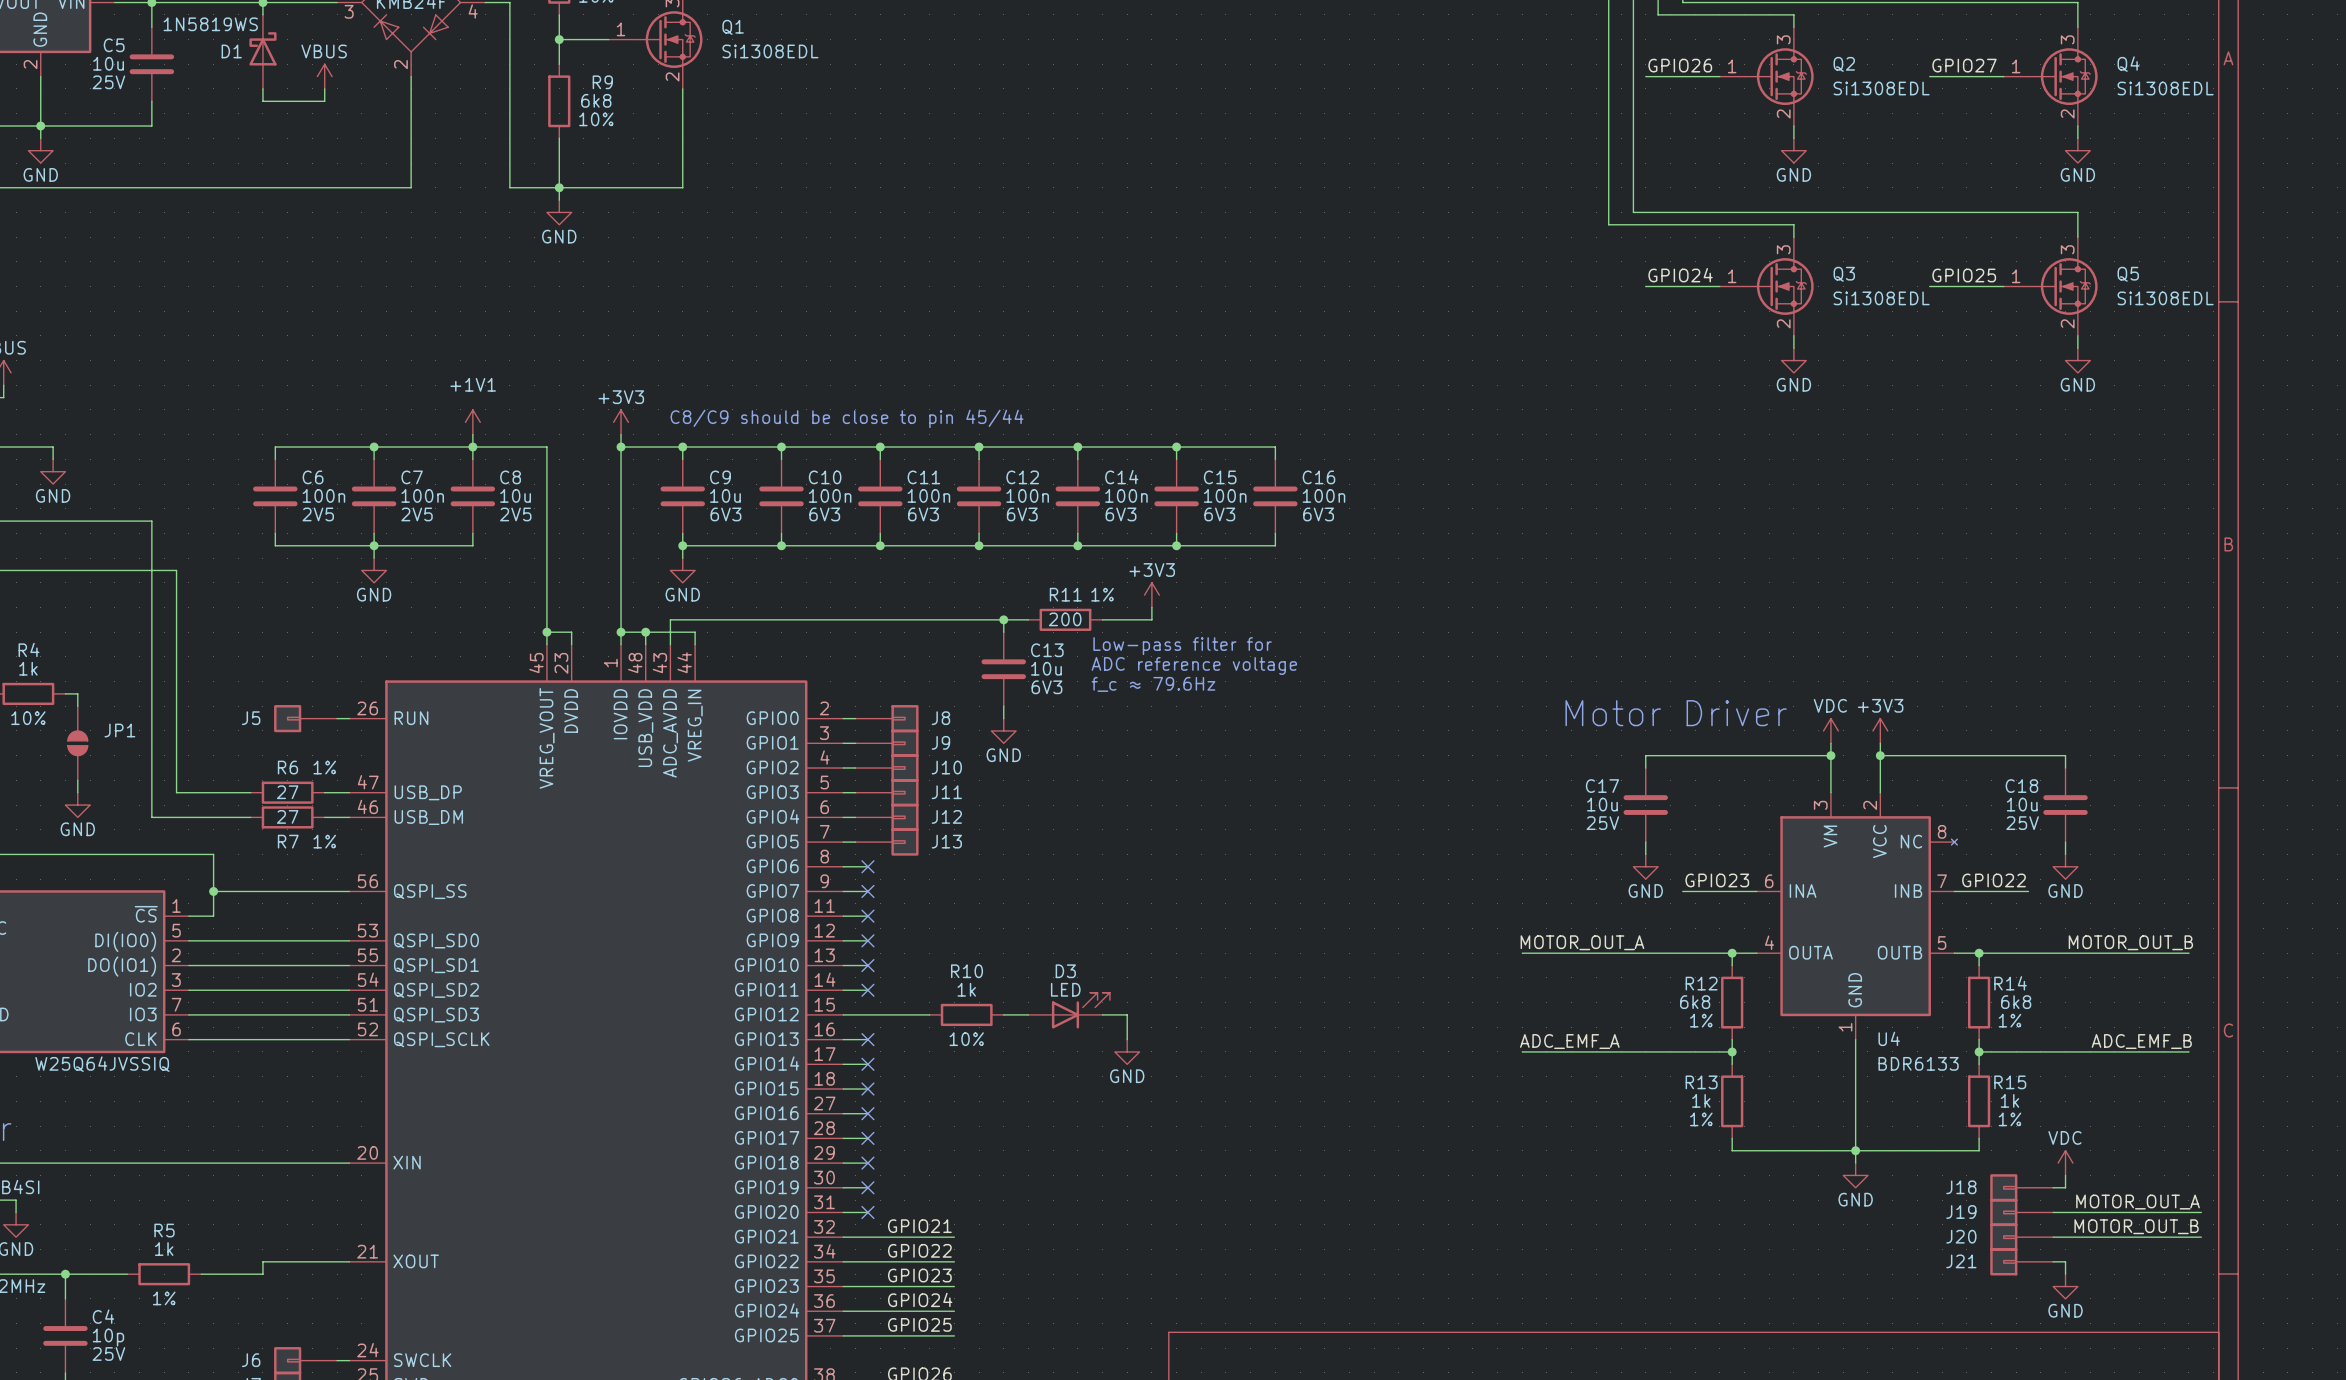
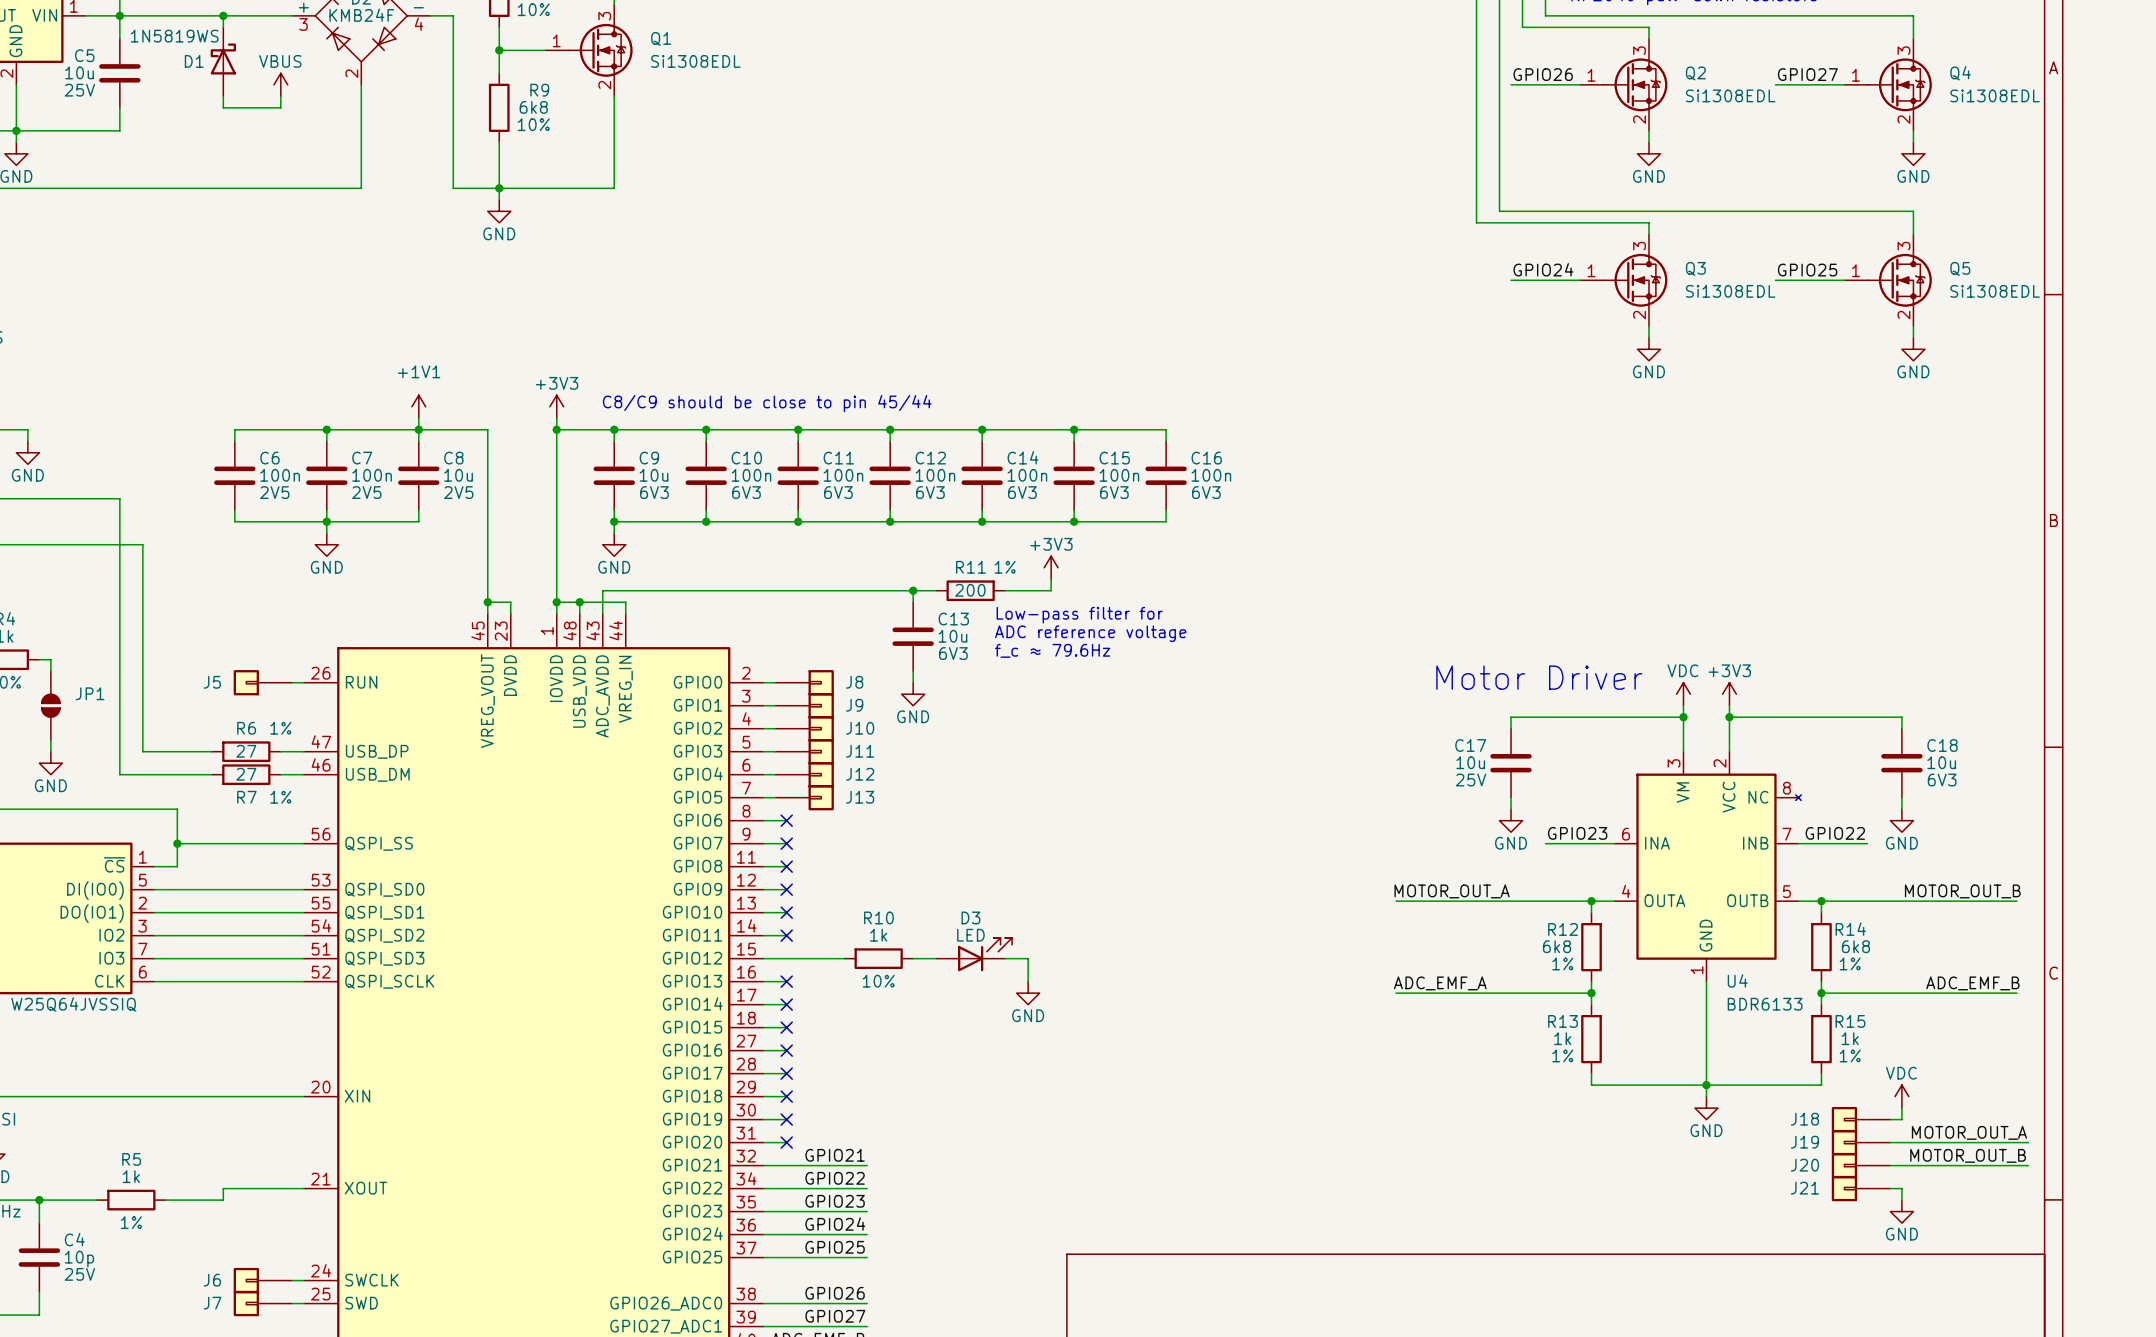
C18 name position: C18 (2021, 786) -> C18 (1942, 745)
C18 value position: 10u (2022, 804) -> 10u (1941, 762)
C18 text: 25V (2022, 823) -> 6V3 (1942, 780)

